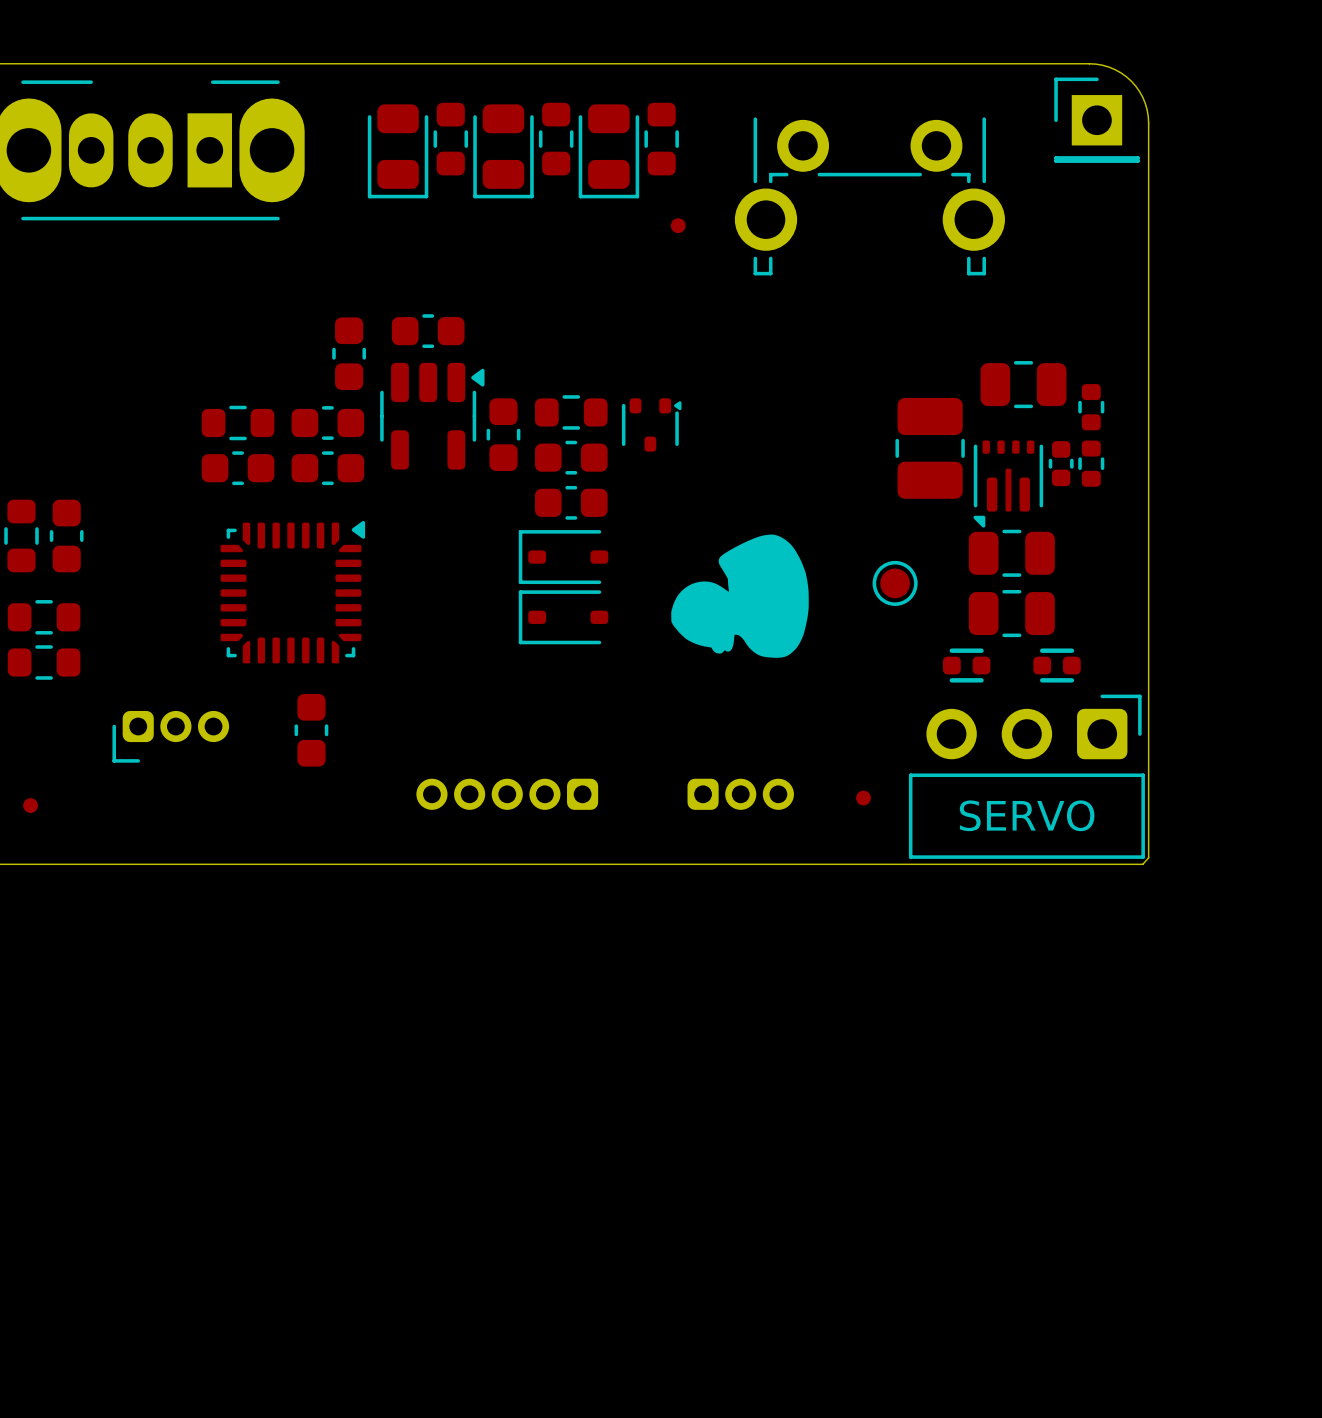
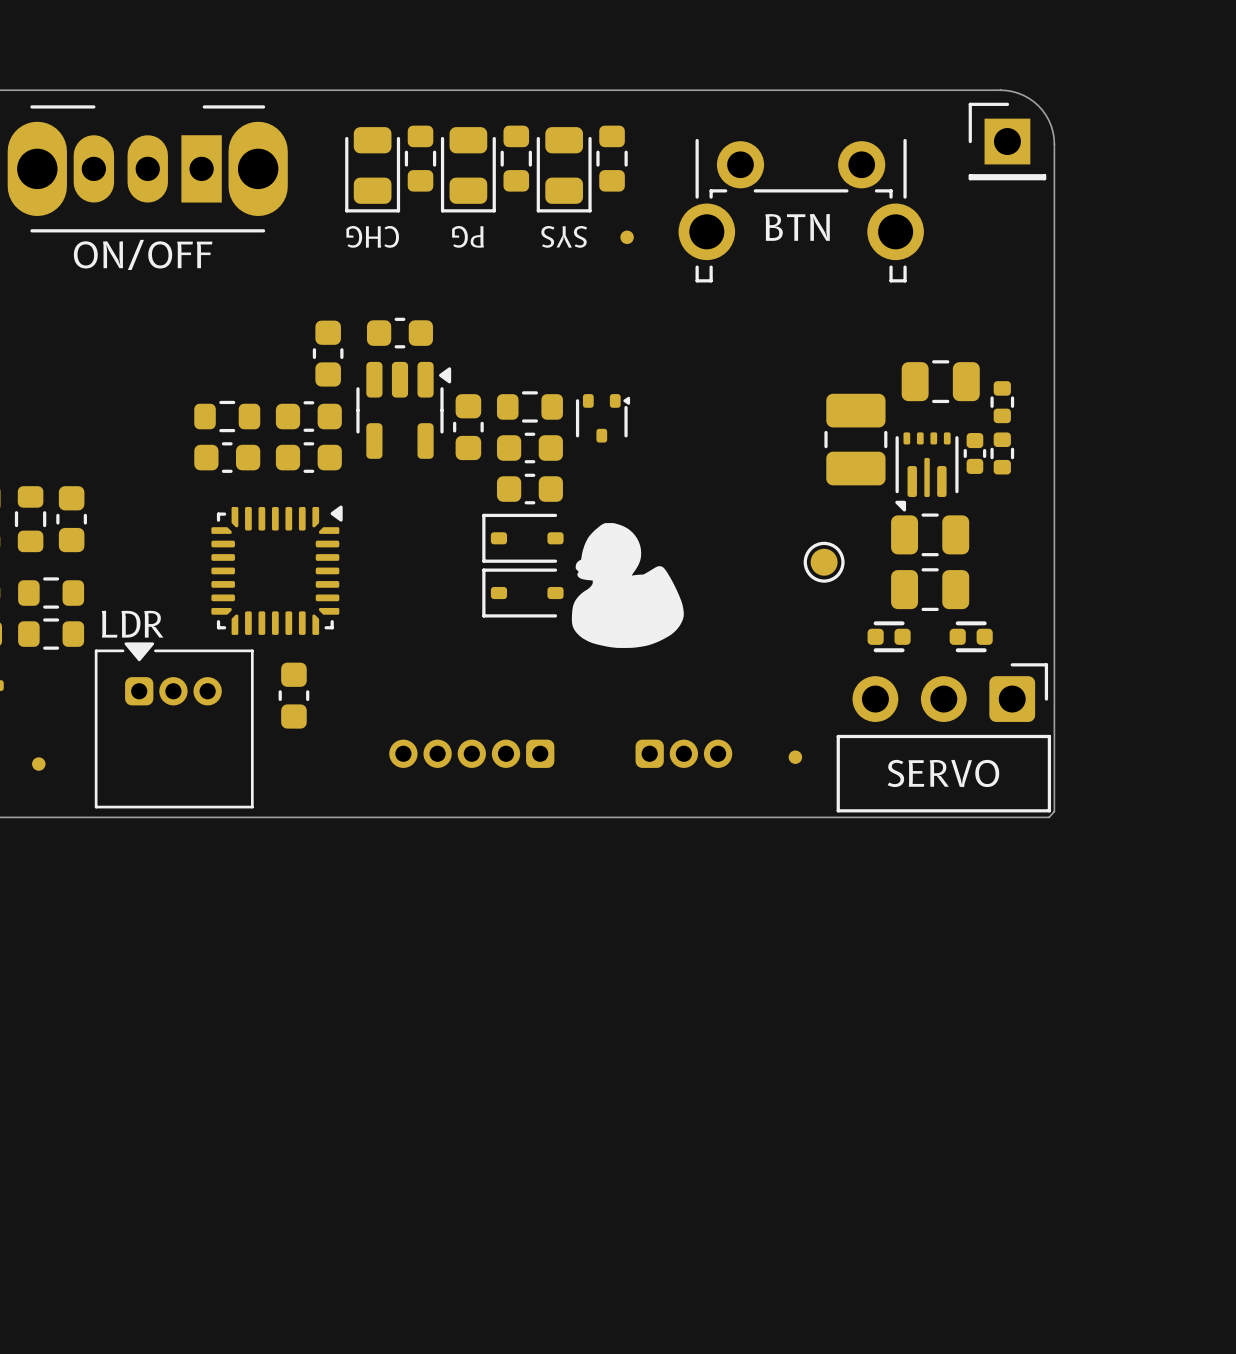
text: none -> BTN (797, 227)
text: none -> CHG (372, 236)
text: none -> PG (468, 236)
text: none -> SYS (564, 236)
text: none -> ON/OFF (143, 254)
drawing: [671, 534, 809, 658] -> none
drawing: none -> [571, 523, 684, 648]
text: none -> LDR (132, 624)
part footprint: [112, 710, 230, 763] -> [94, 642, 254, 809]

